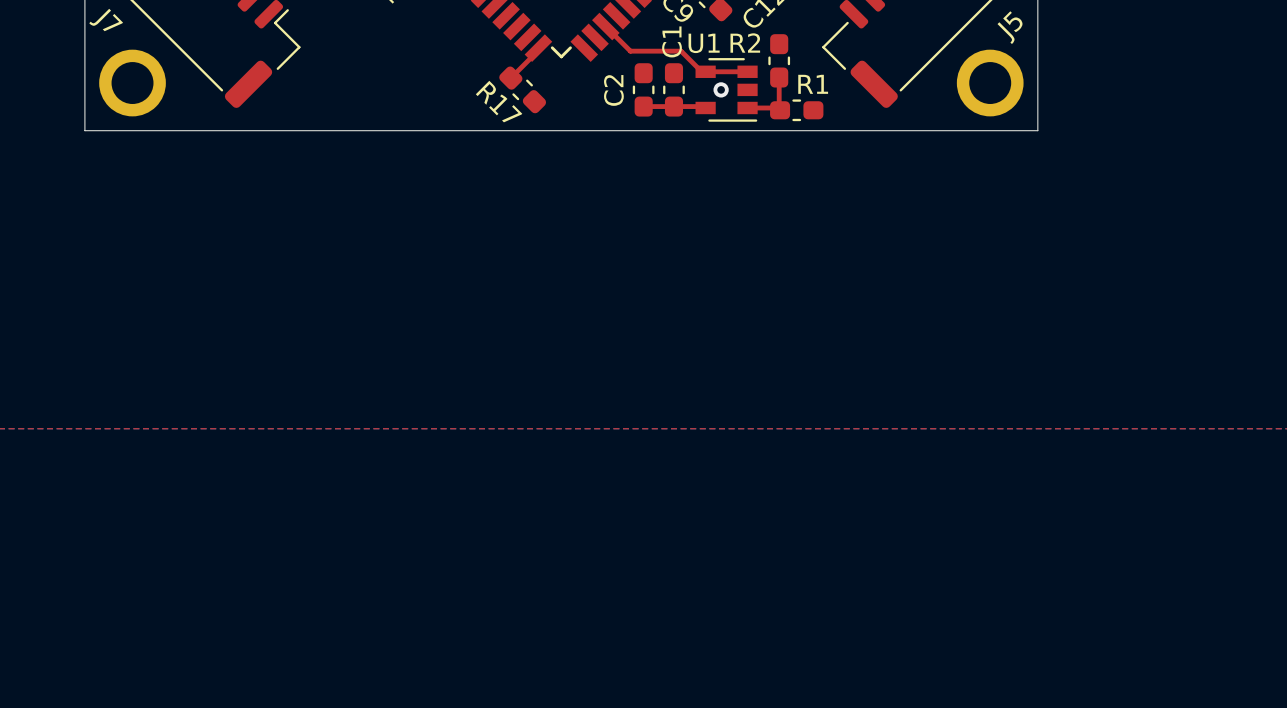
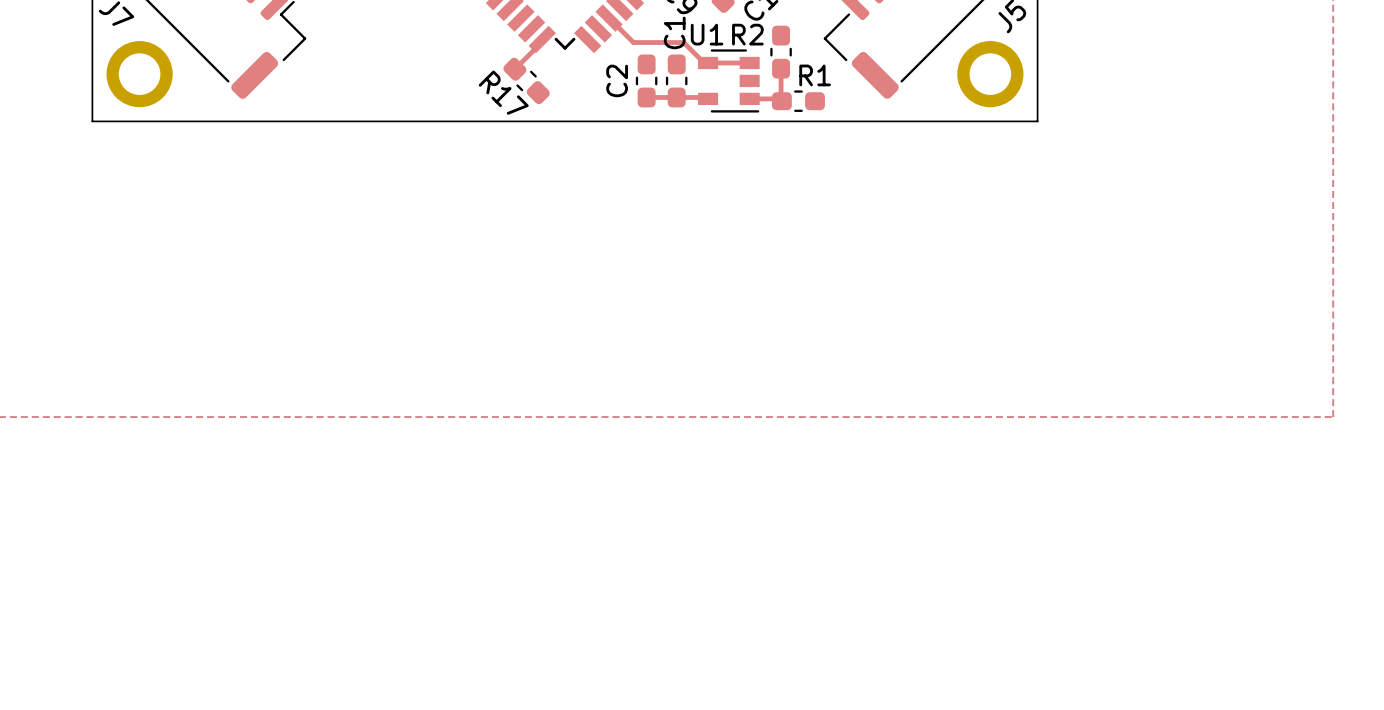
via: (721, 89) -> none

